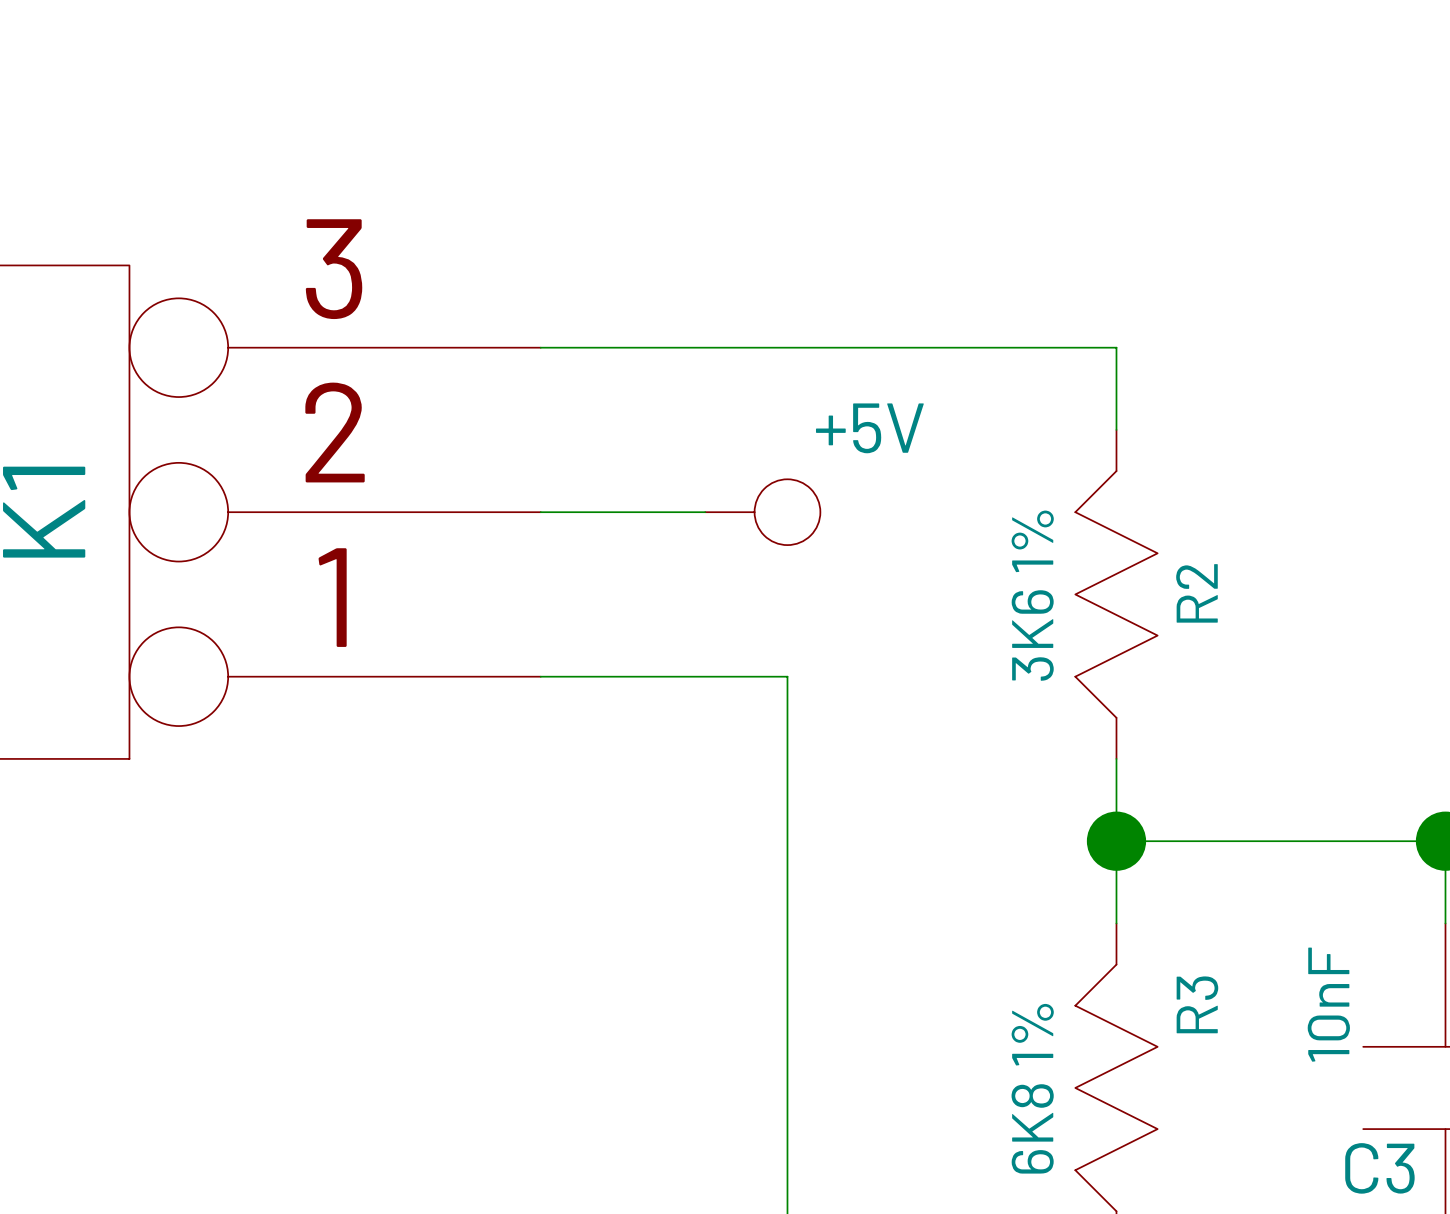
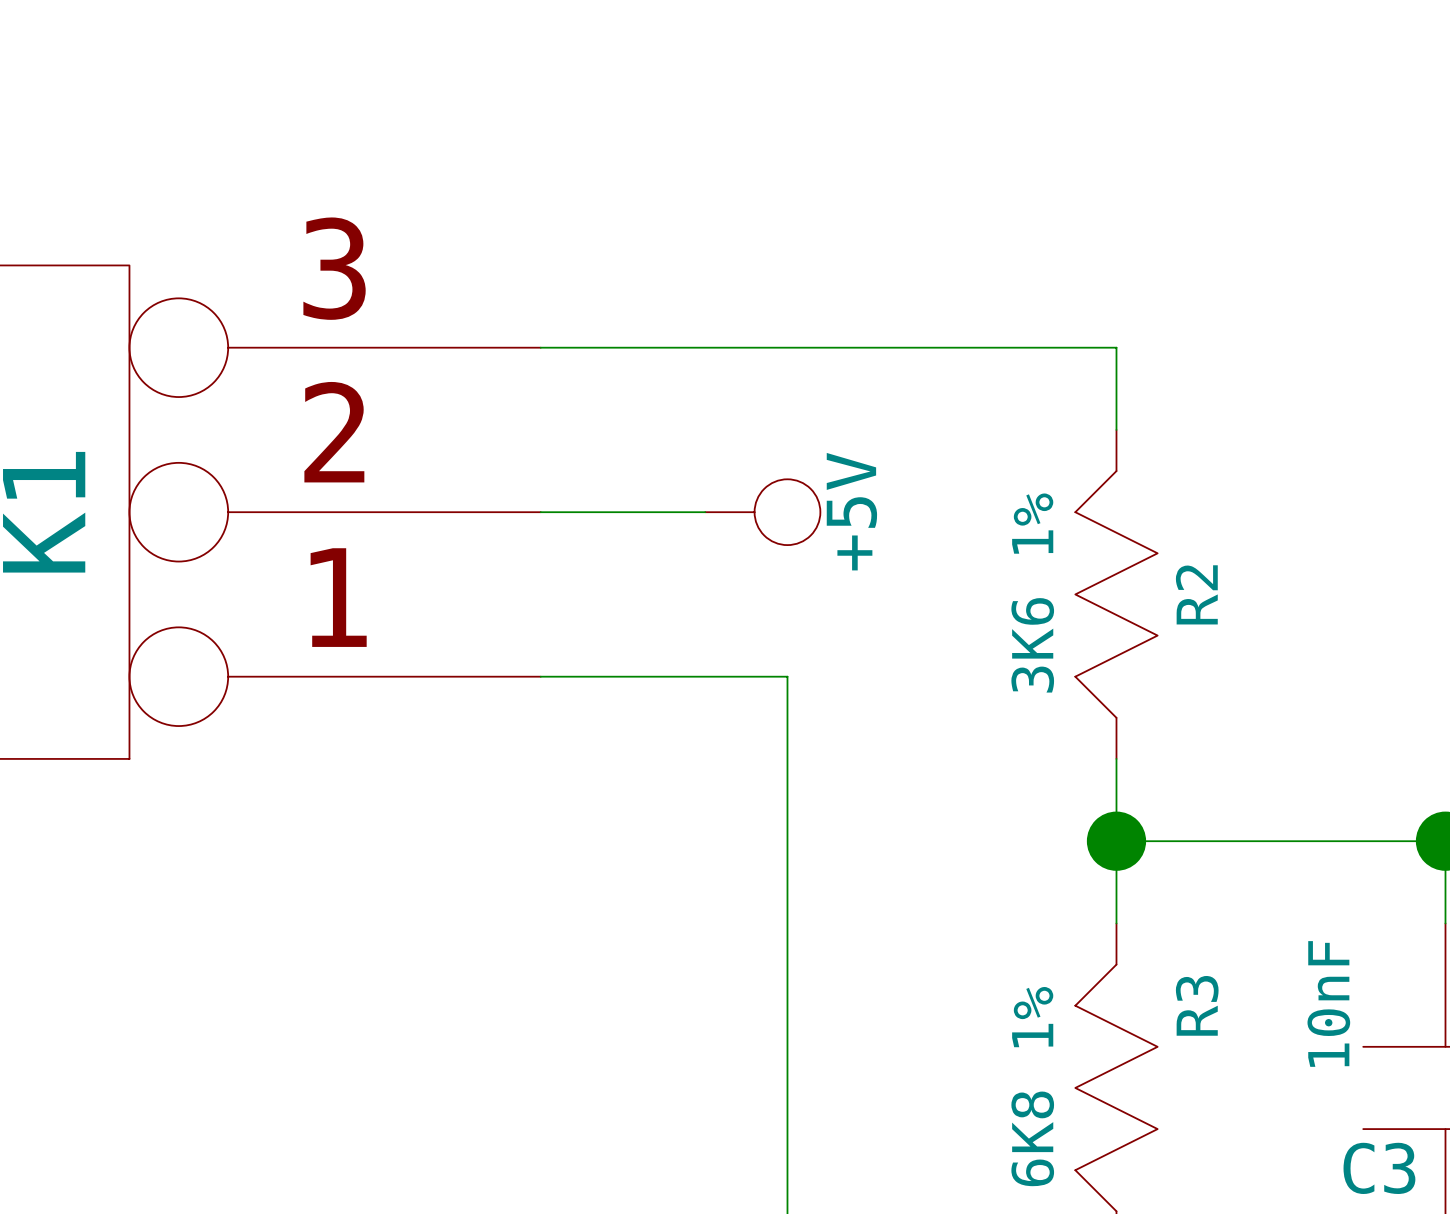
power symbol text rotation: 0° (869, 428) -> 90° counterclockwise (851, 511)

